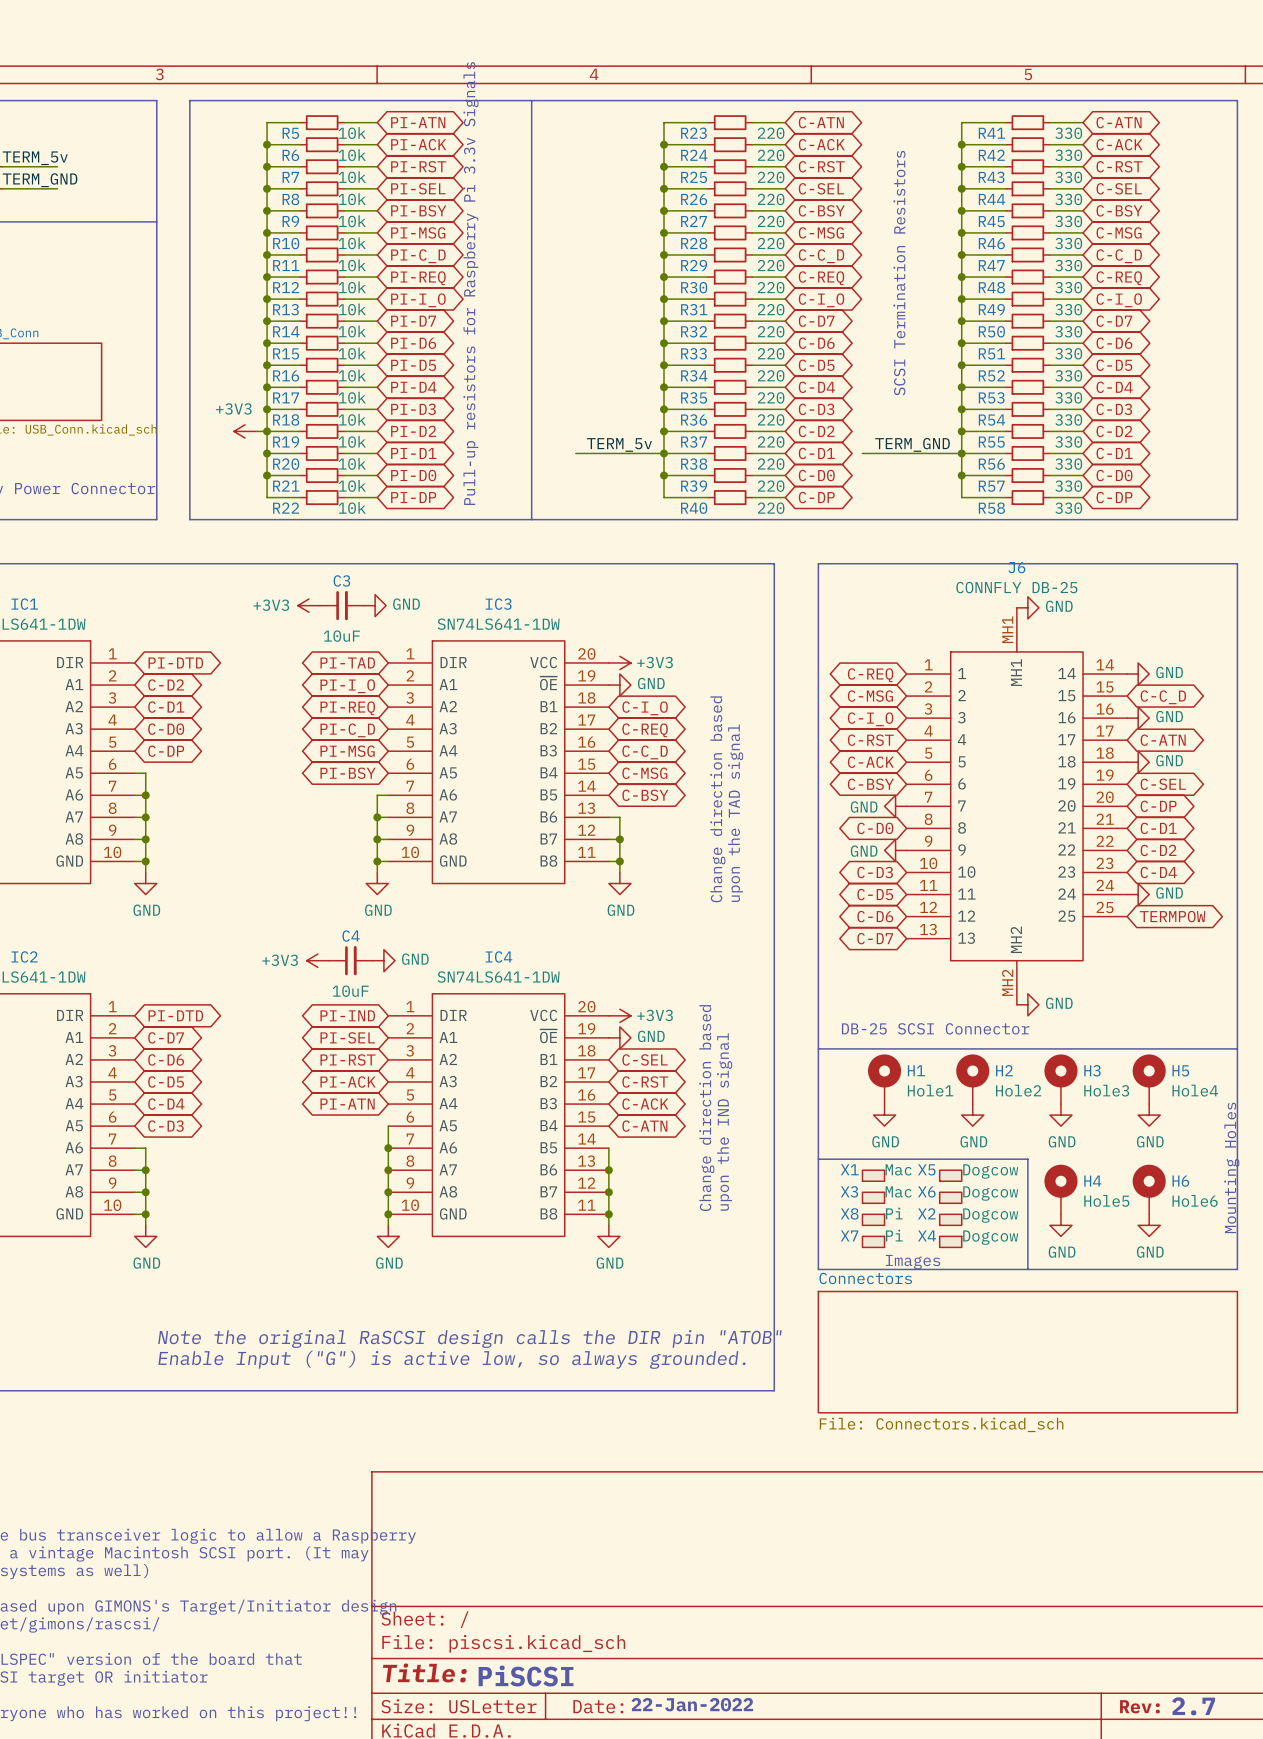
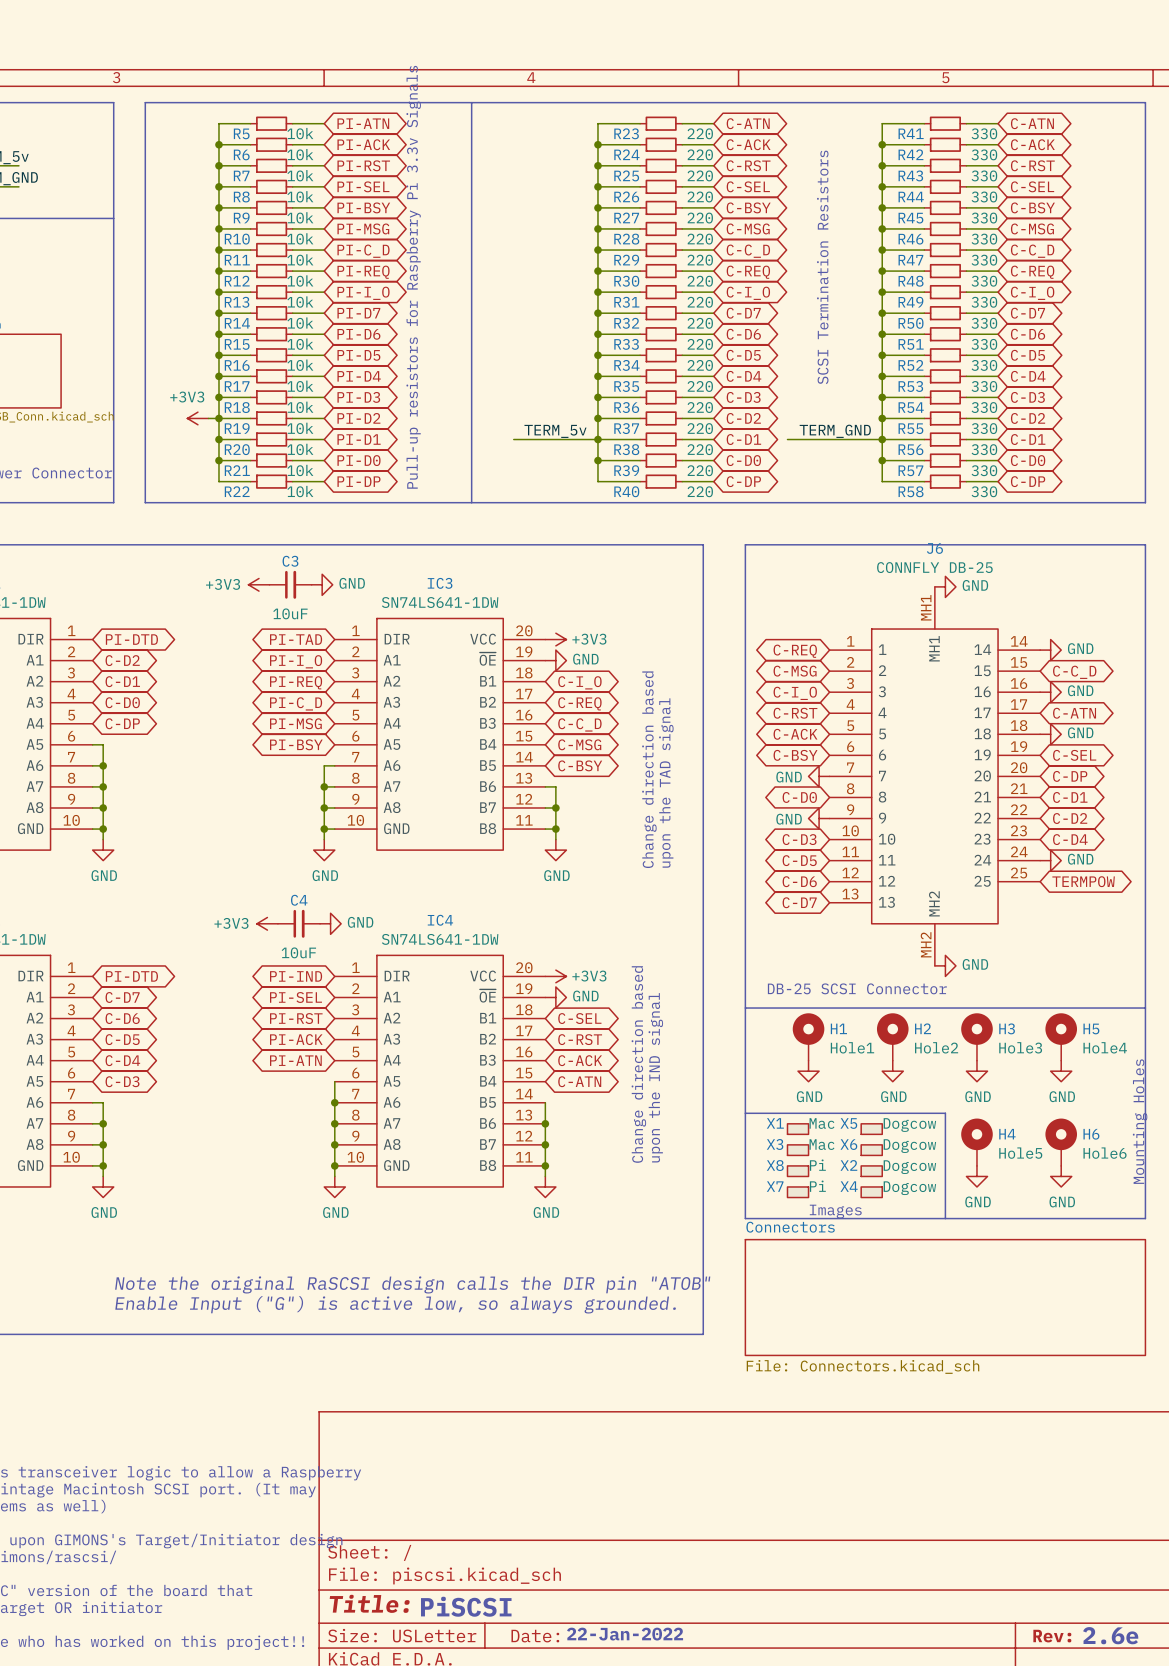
text: 2.7 (1193, 1706) -> 2.6e (1110, 1635)

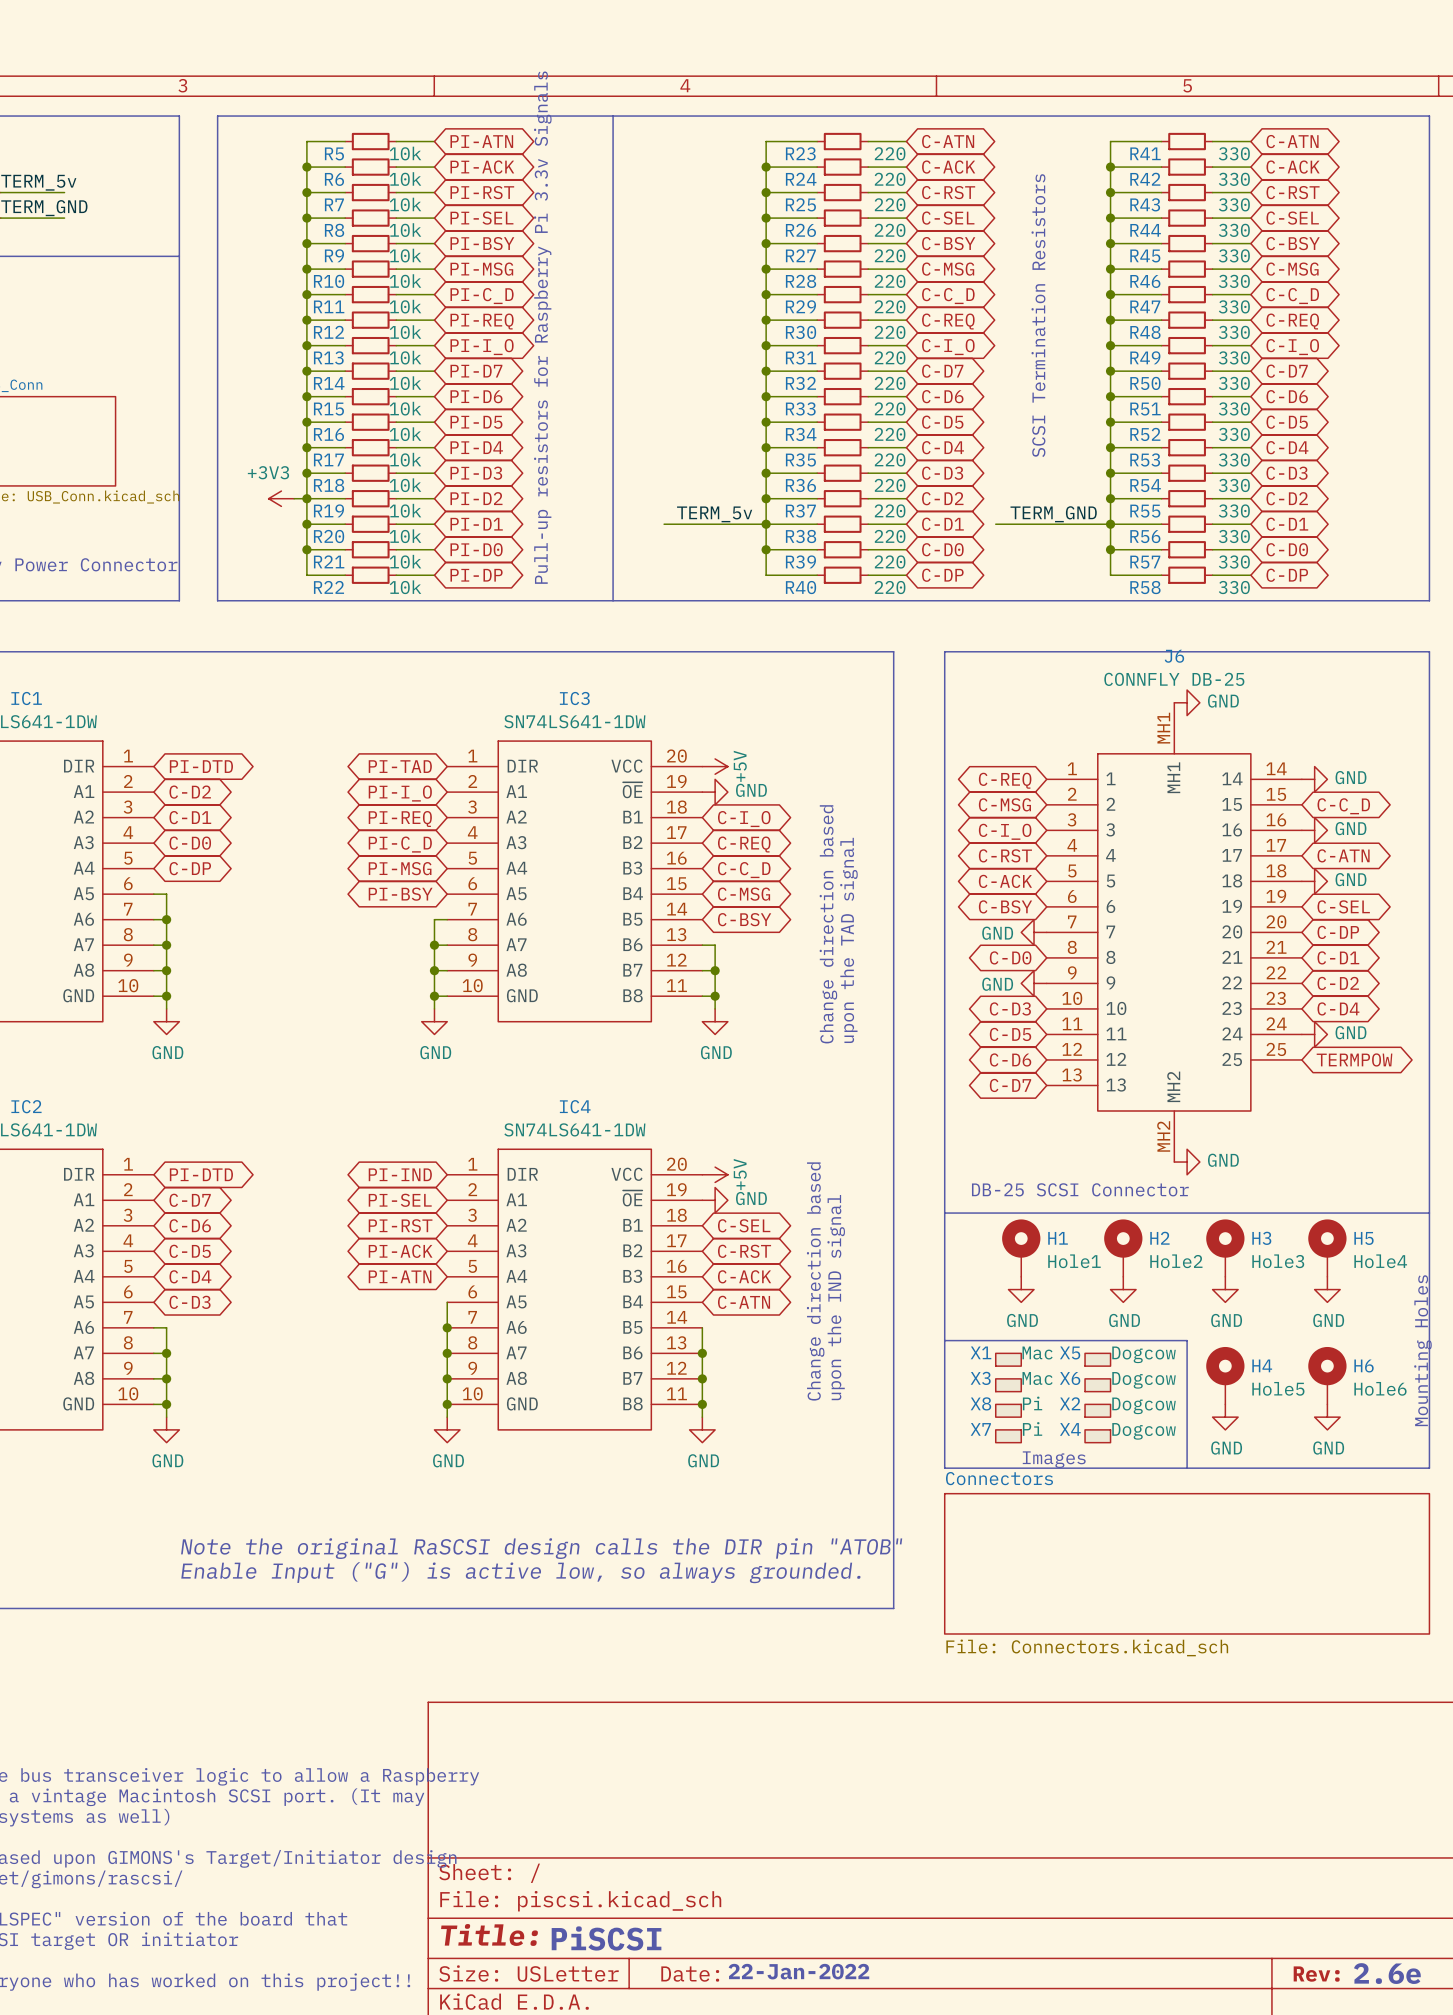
power symbol: +3V3 (258, 584) -> none
C3: 10uF (290, 584) -> none
power symbol: GND (322, 584) -> none
power symbol: +3V3 (555, 639) -> +5V (715, 766)
power symbol: +3V3 (267, 923) -> none
C4: 10uF (299, 923) -> none
power symbol: GND (330, 923) -> none
power symbol: +3V3 (555, 976) -> +5V (715, 1174)

